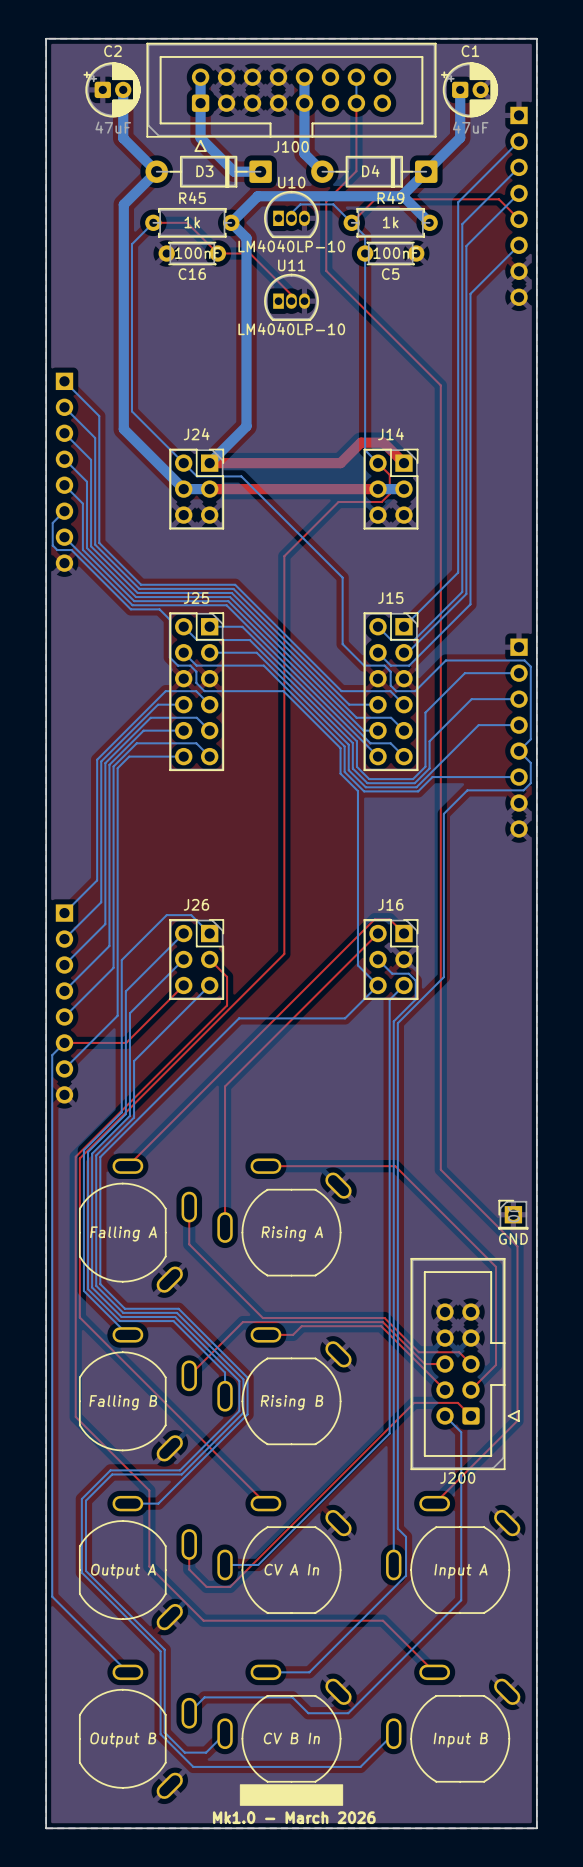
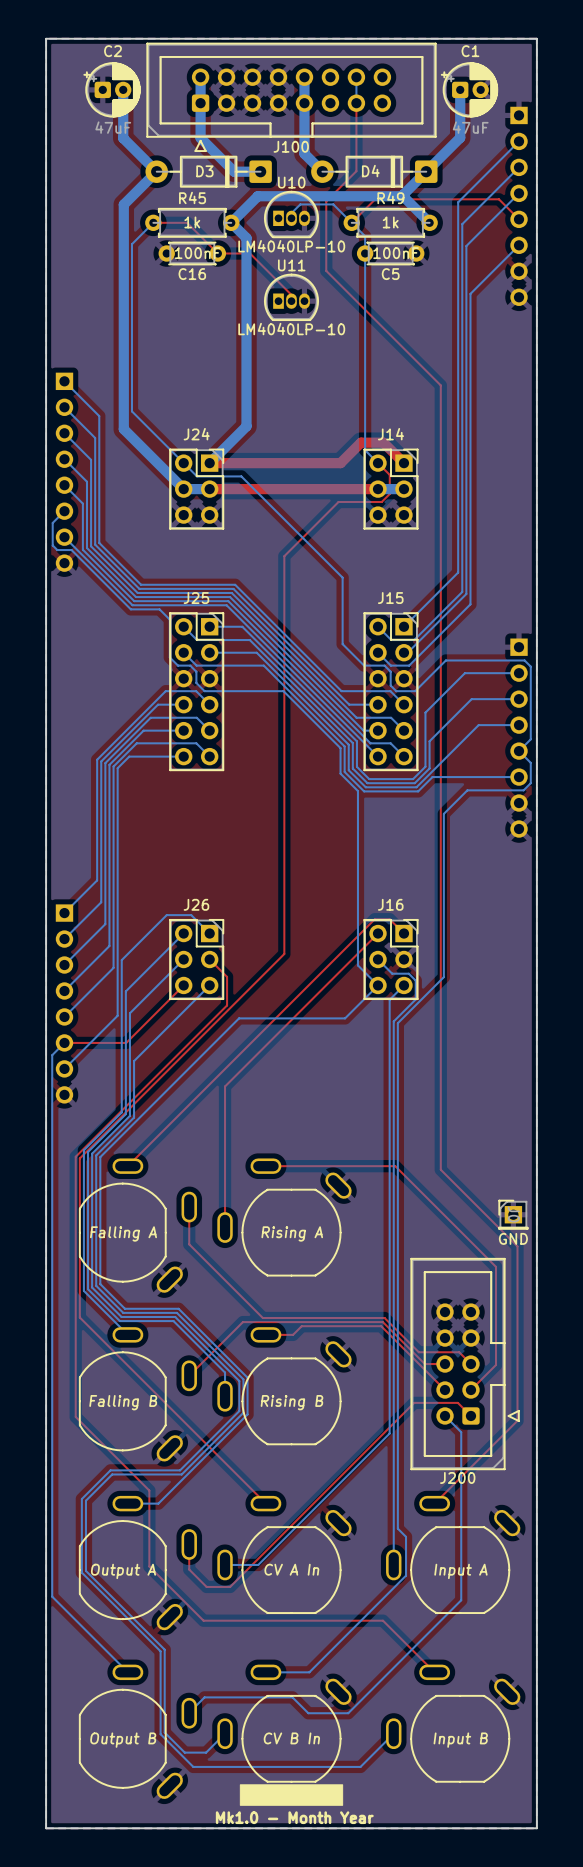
text: Mk1.0 - March 2026 (294, 1817) -> Mk1.0 - Month Year (294, 1817)

